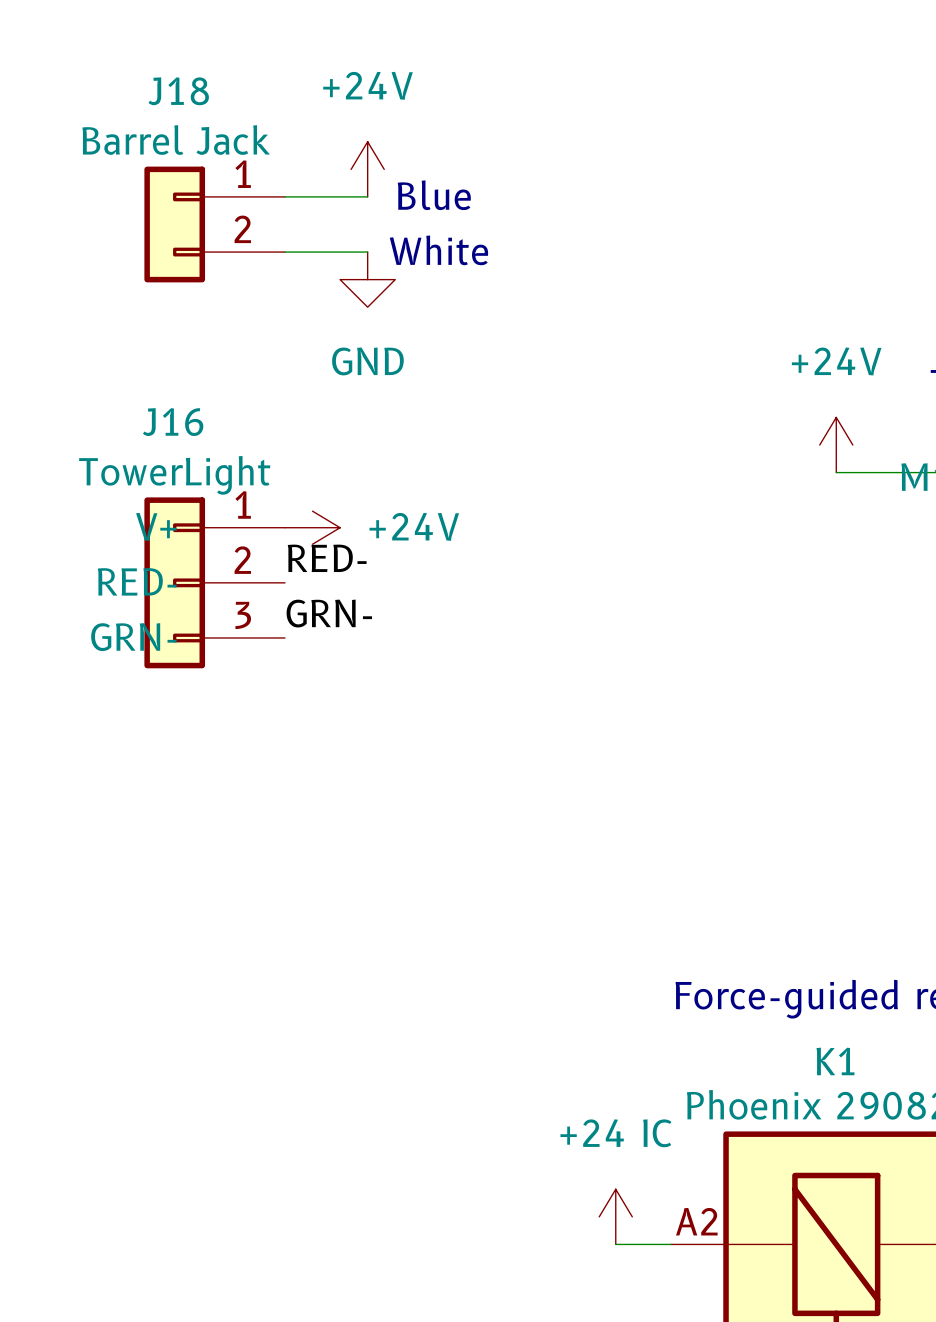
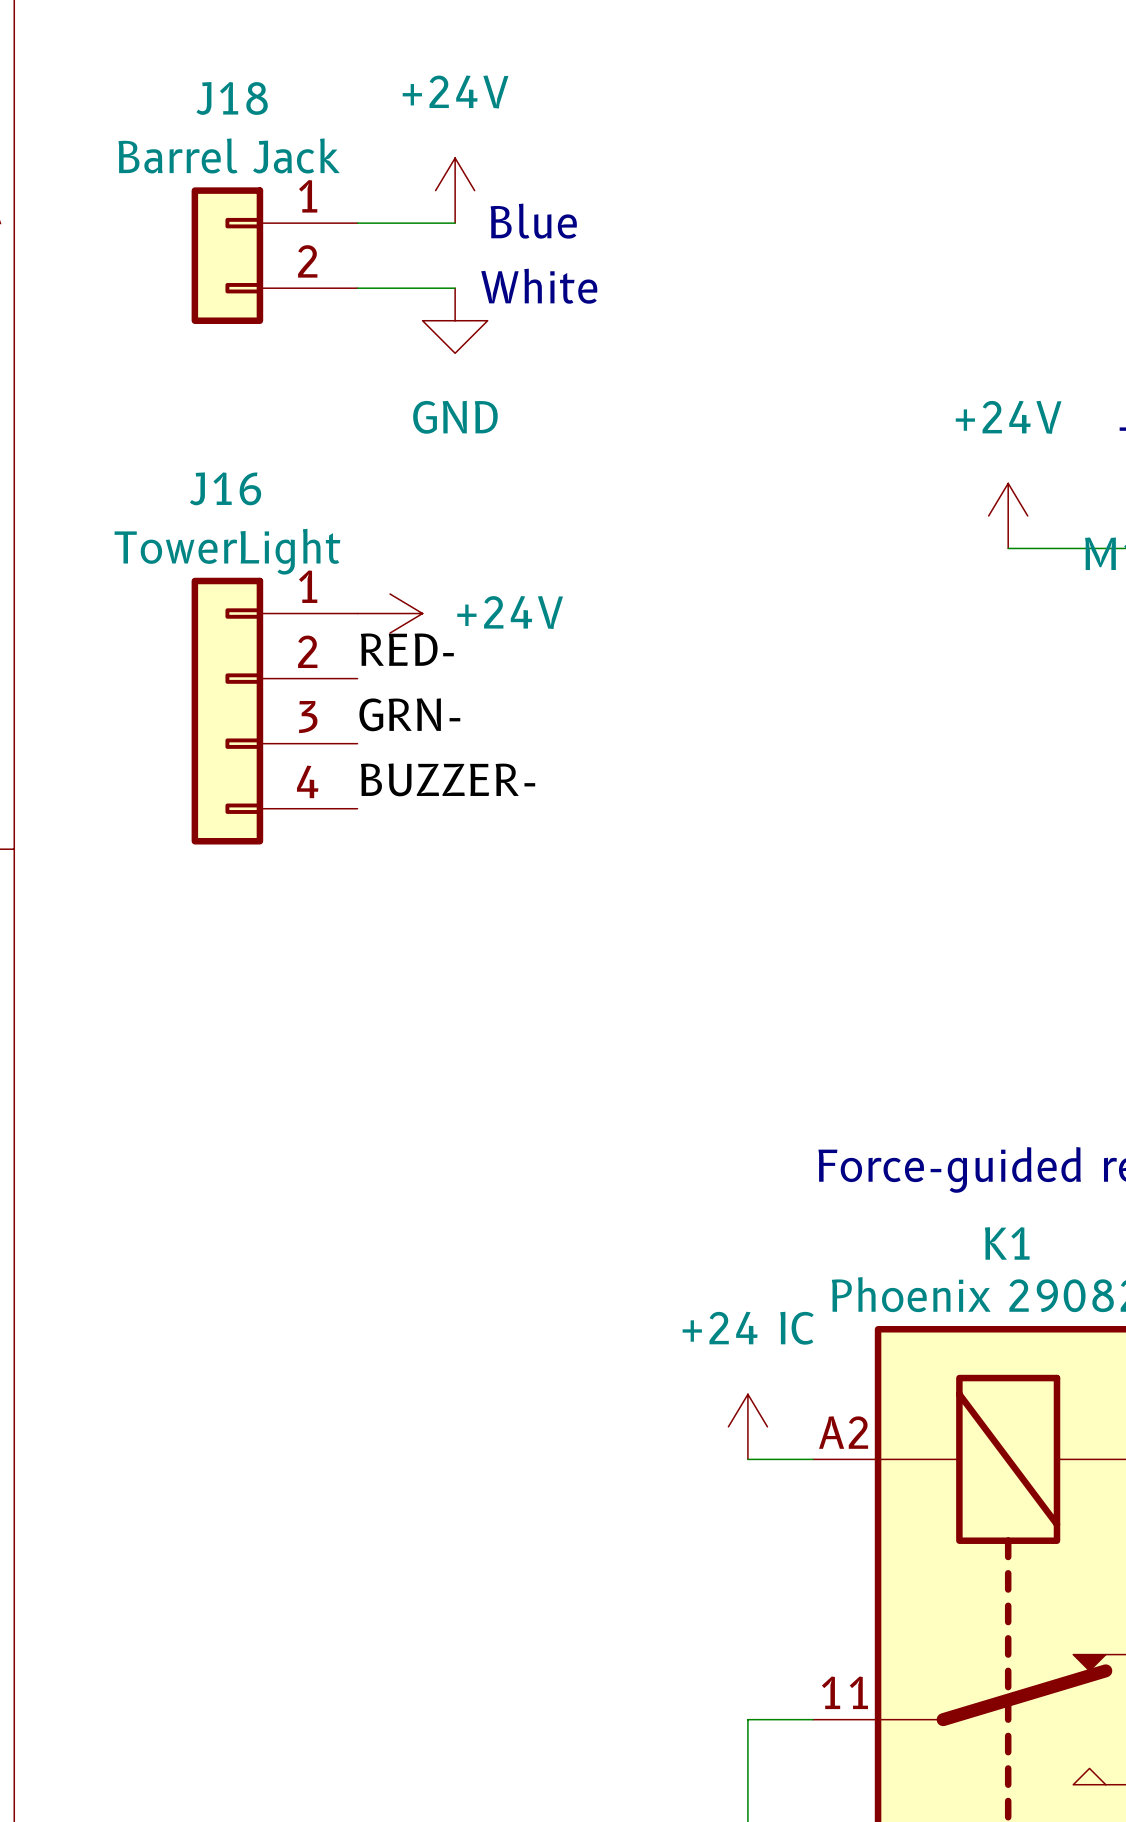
J16 symbol: [144, 497, 285, 669] -> [191, 577, 358, 845]
label: none -> BUZZER- (448, 779)

